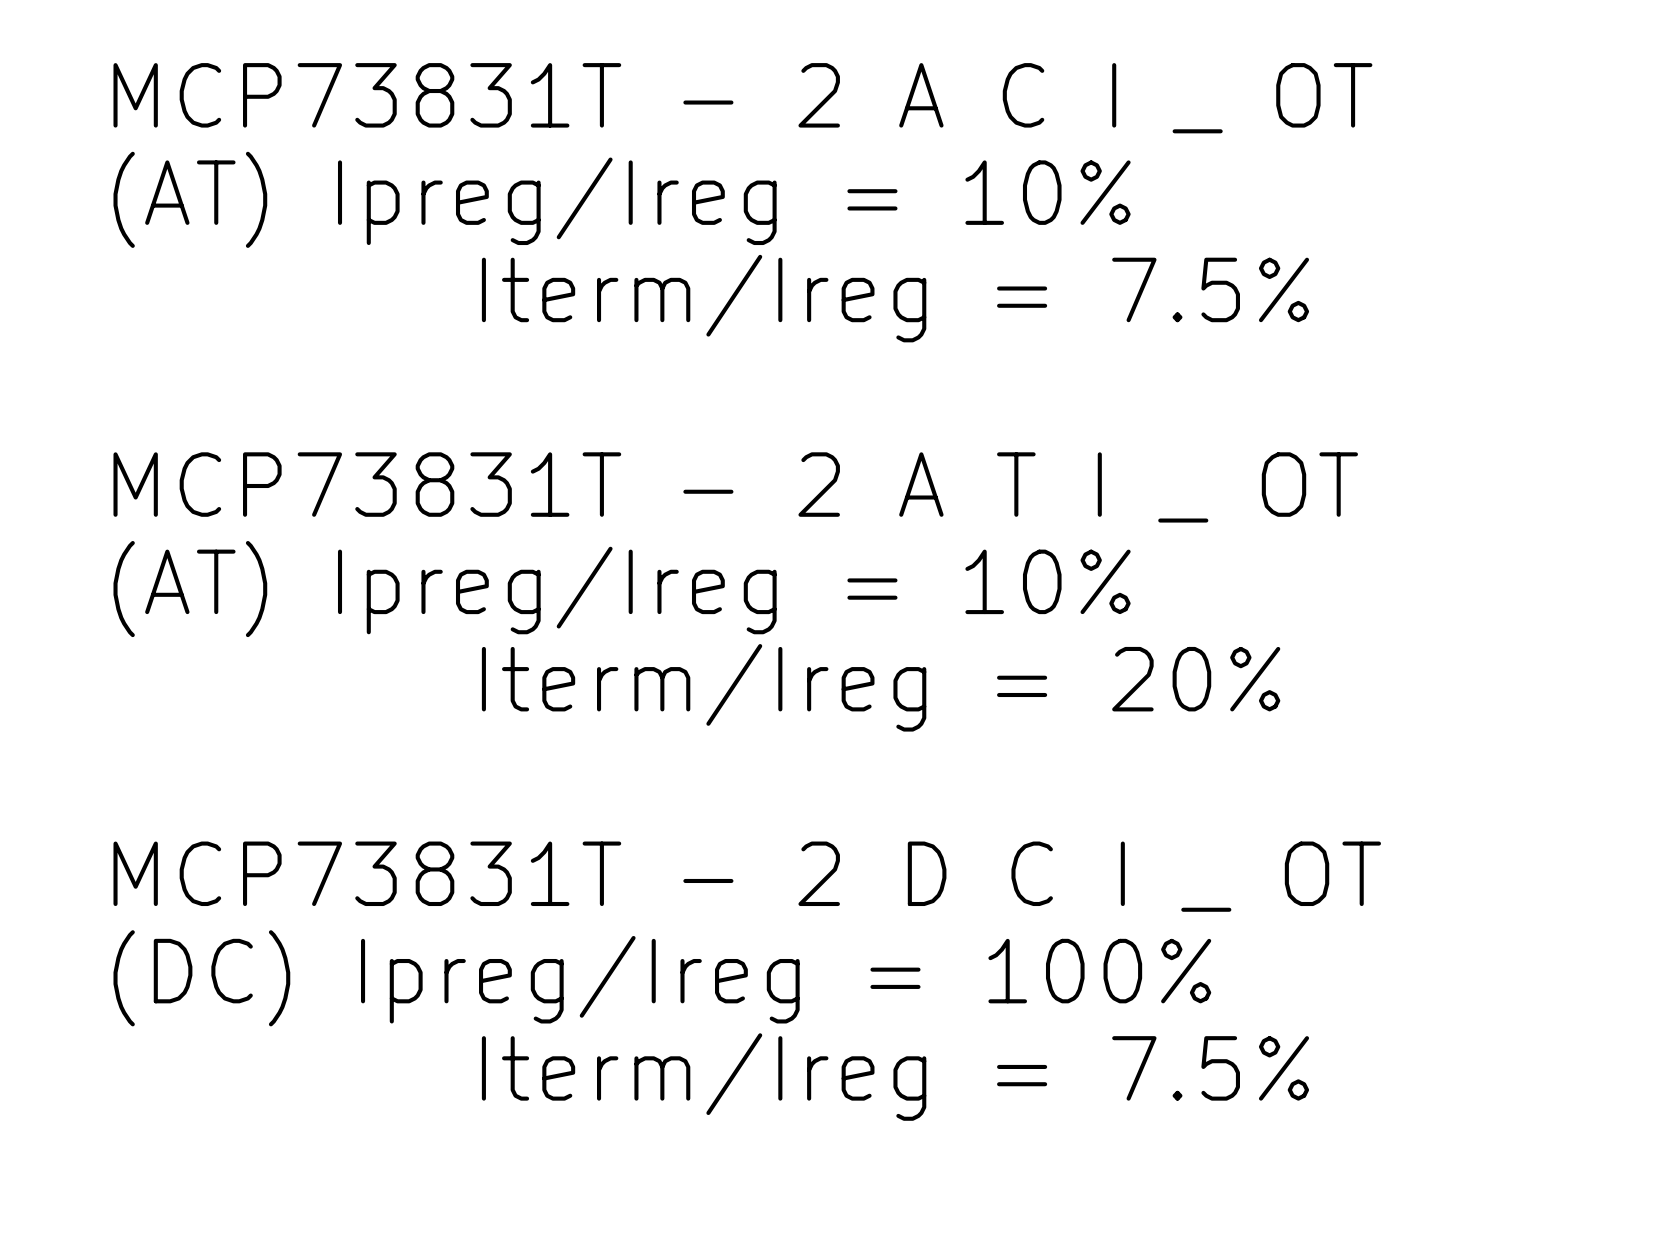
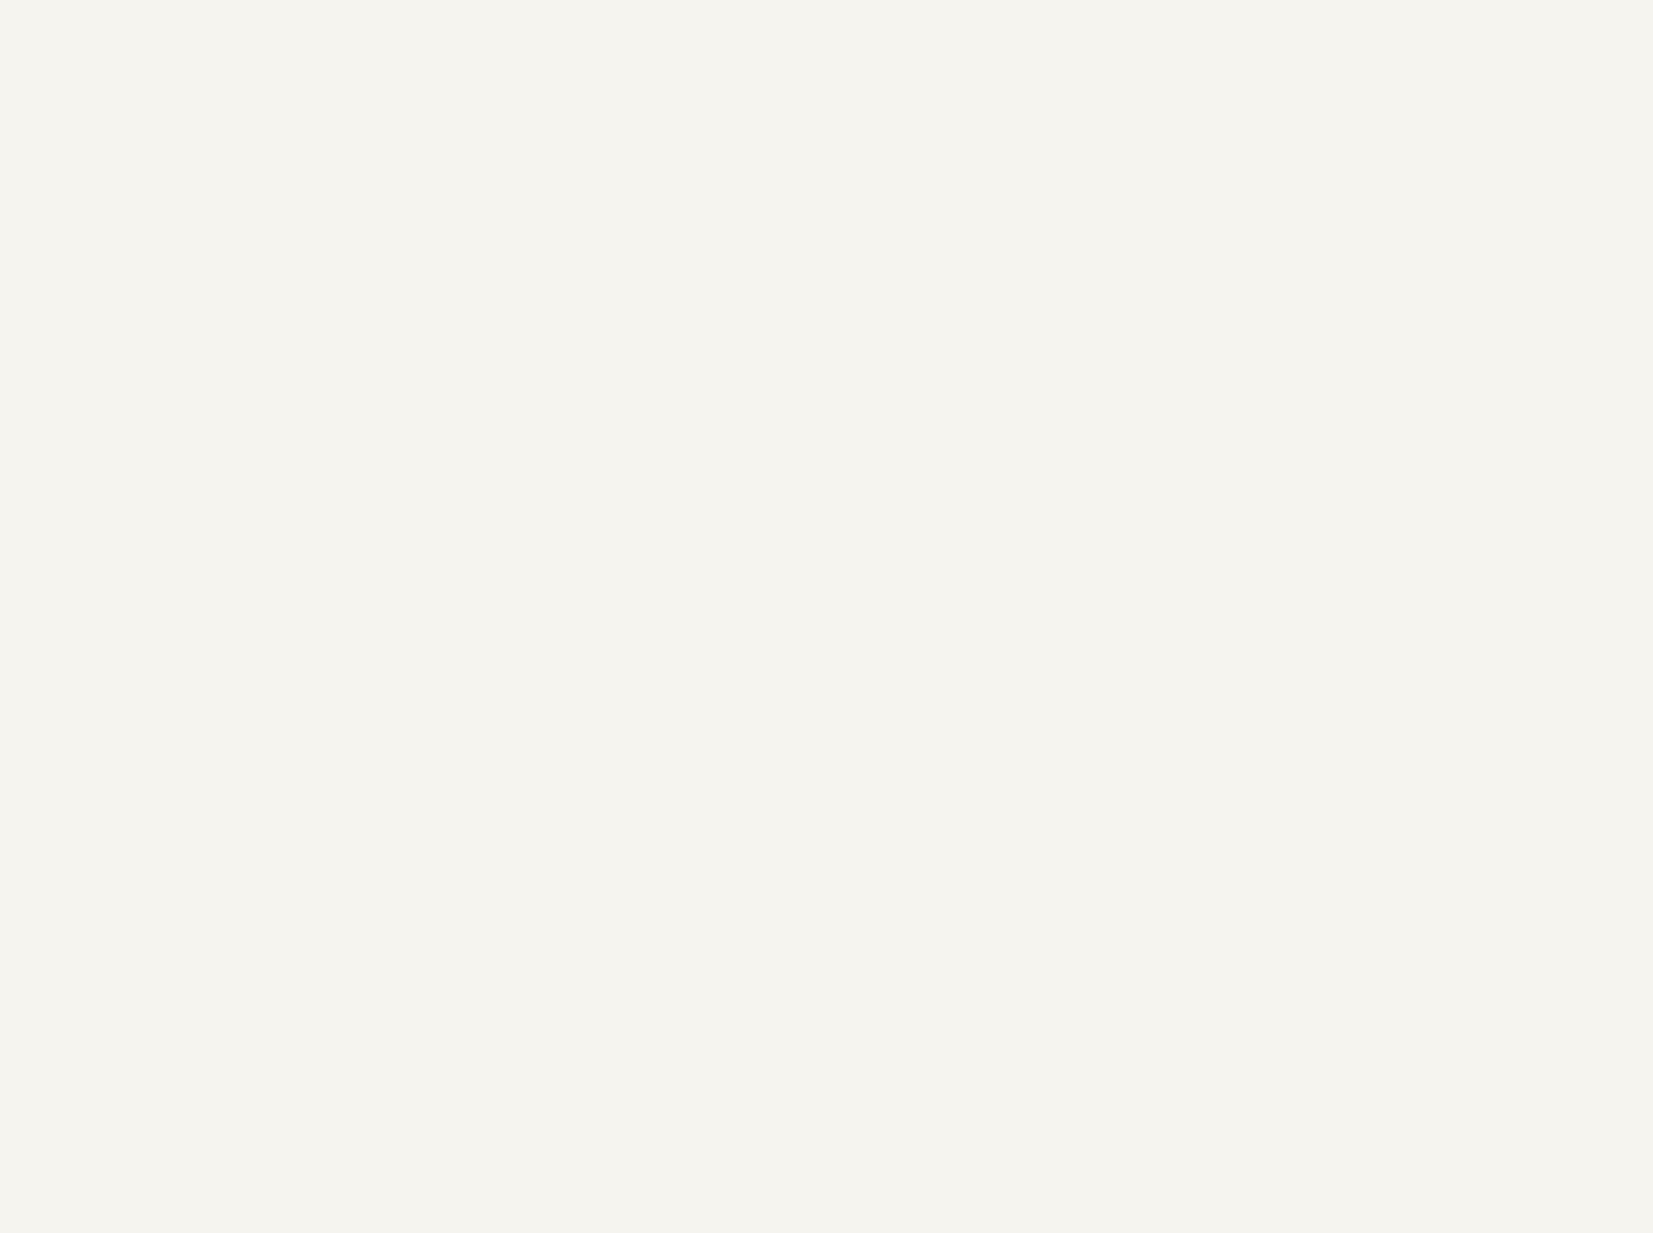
text: MCP73831T - 2 A C I _ OT (742, 98) -> none
text: (AT) Ipreg/Ireg = 10% (622, 199) -> none
text: Iterm/Ireg = 7.5% (895, 298) -> none
text: MCP73831T - 2 A T I _ OT (735, 487) -> none
text: (AT) Ipreg/Ireg = 10% (622, 589) -> none
text: Iterm/Ireg = 20% (881, 687) -> none
text: MCP73831T - 2 D C I _ OT (747, 876) -> none
text: (DC) Ipreg/Ireg = 100% (662, 978) -> none
text: Iterm/Ireg = 7.5% (895, 1077) -> none

